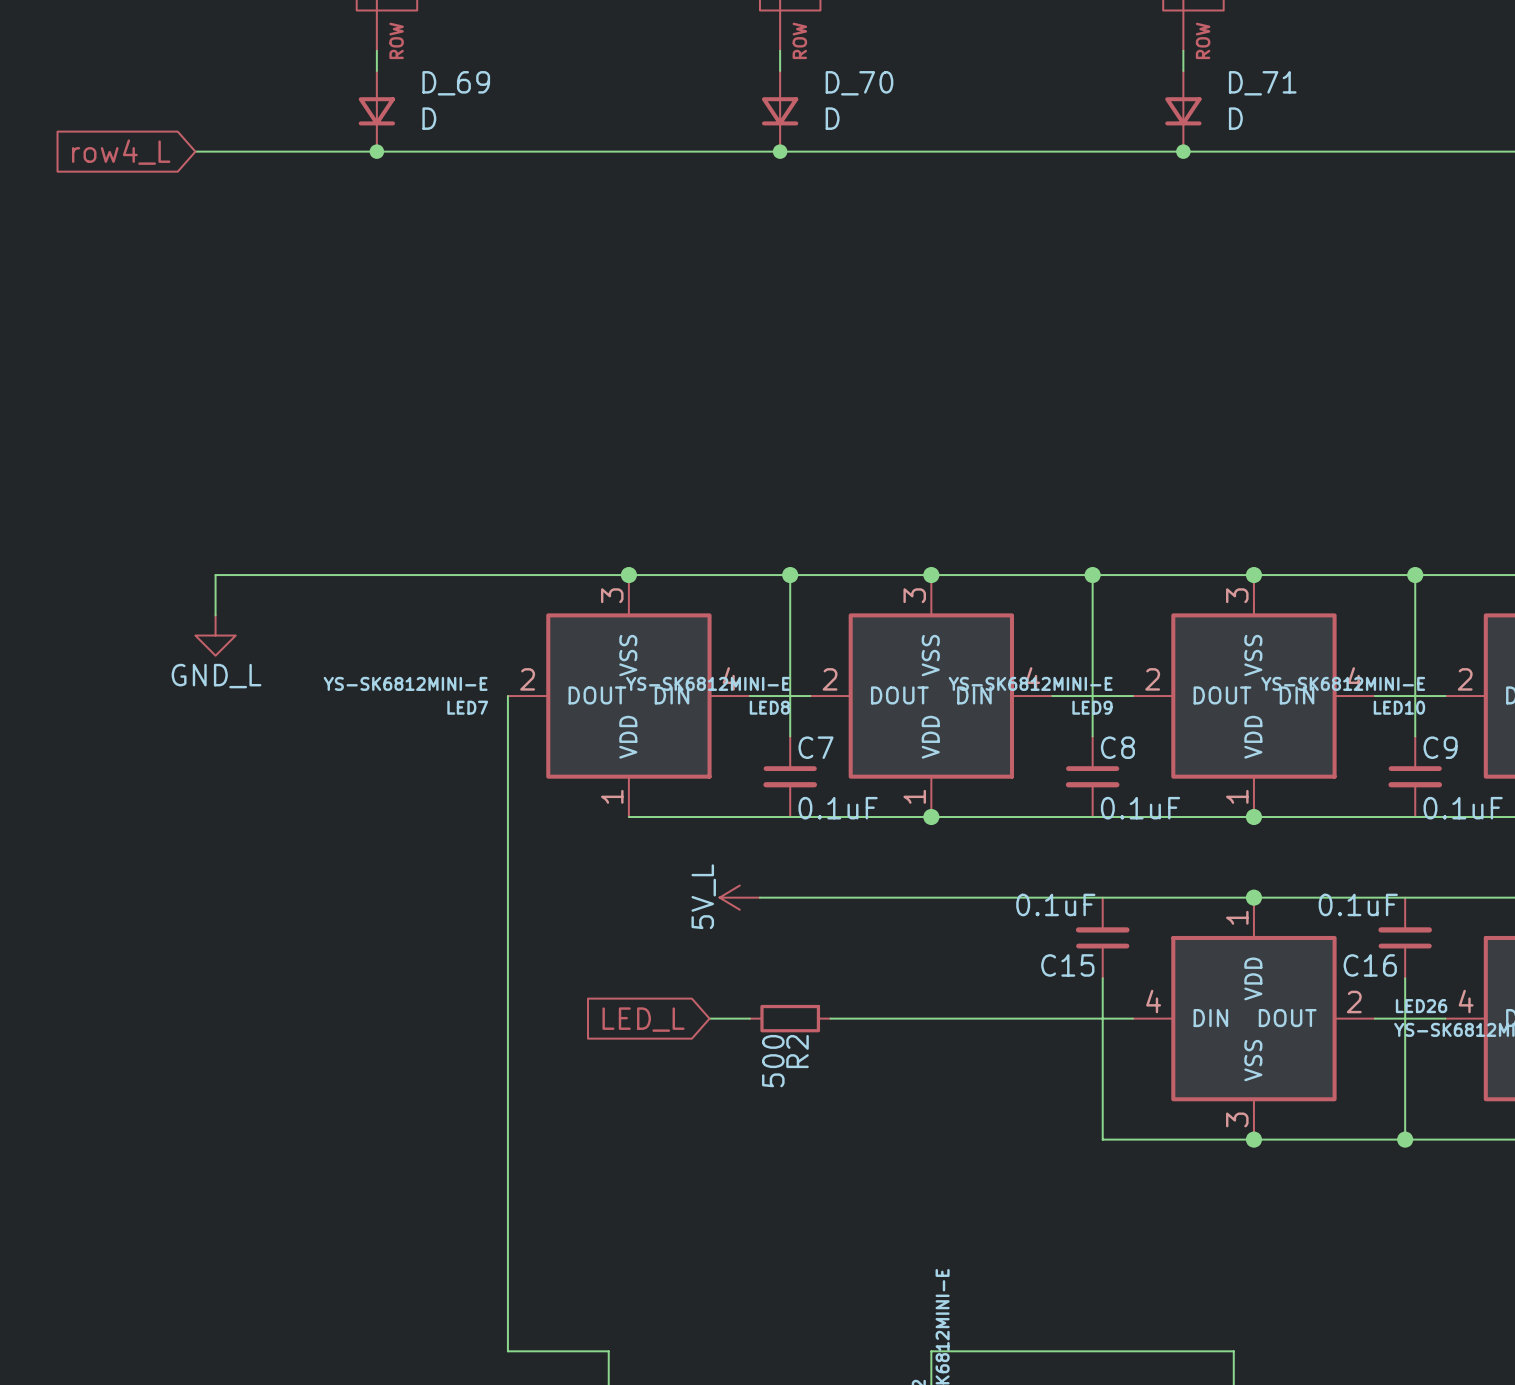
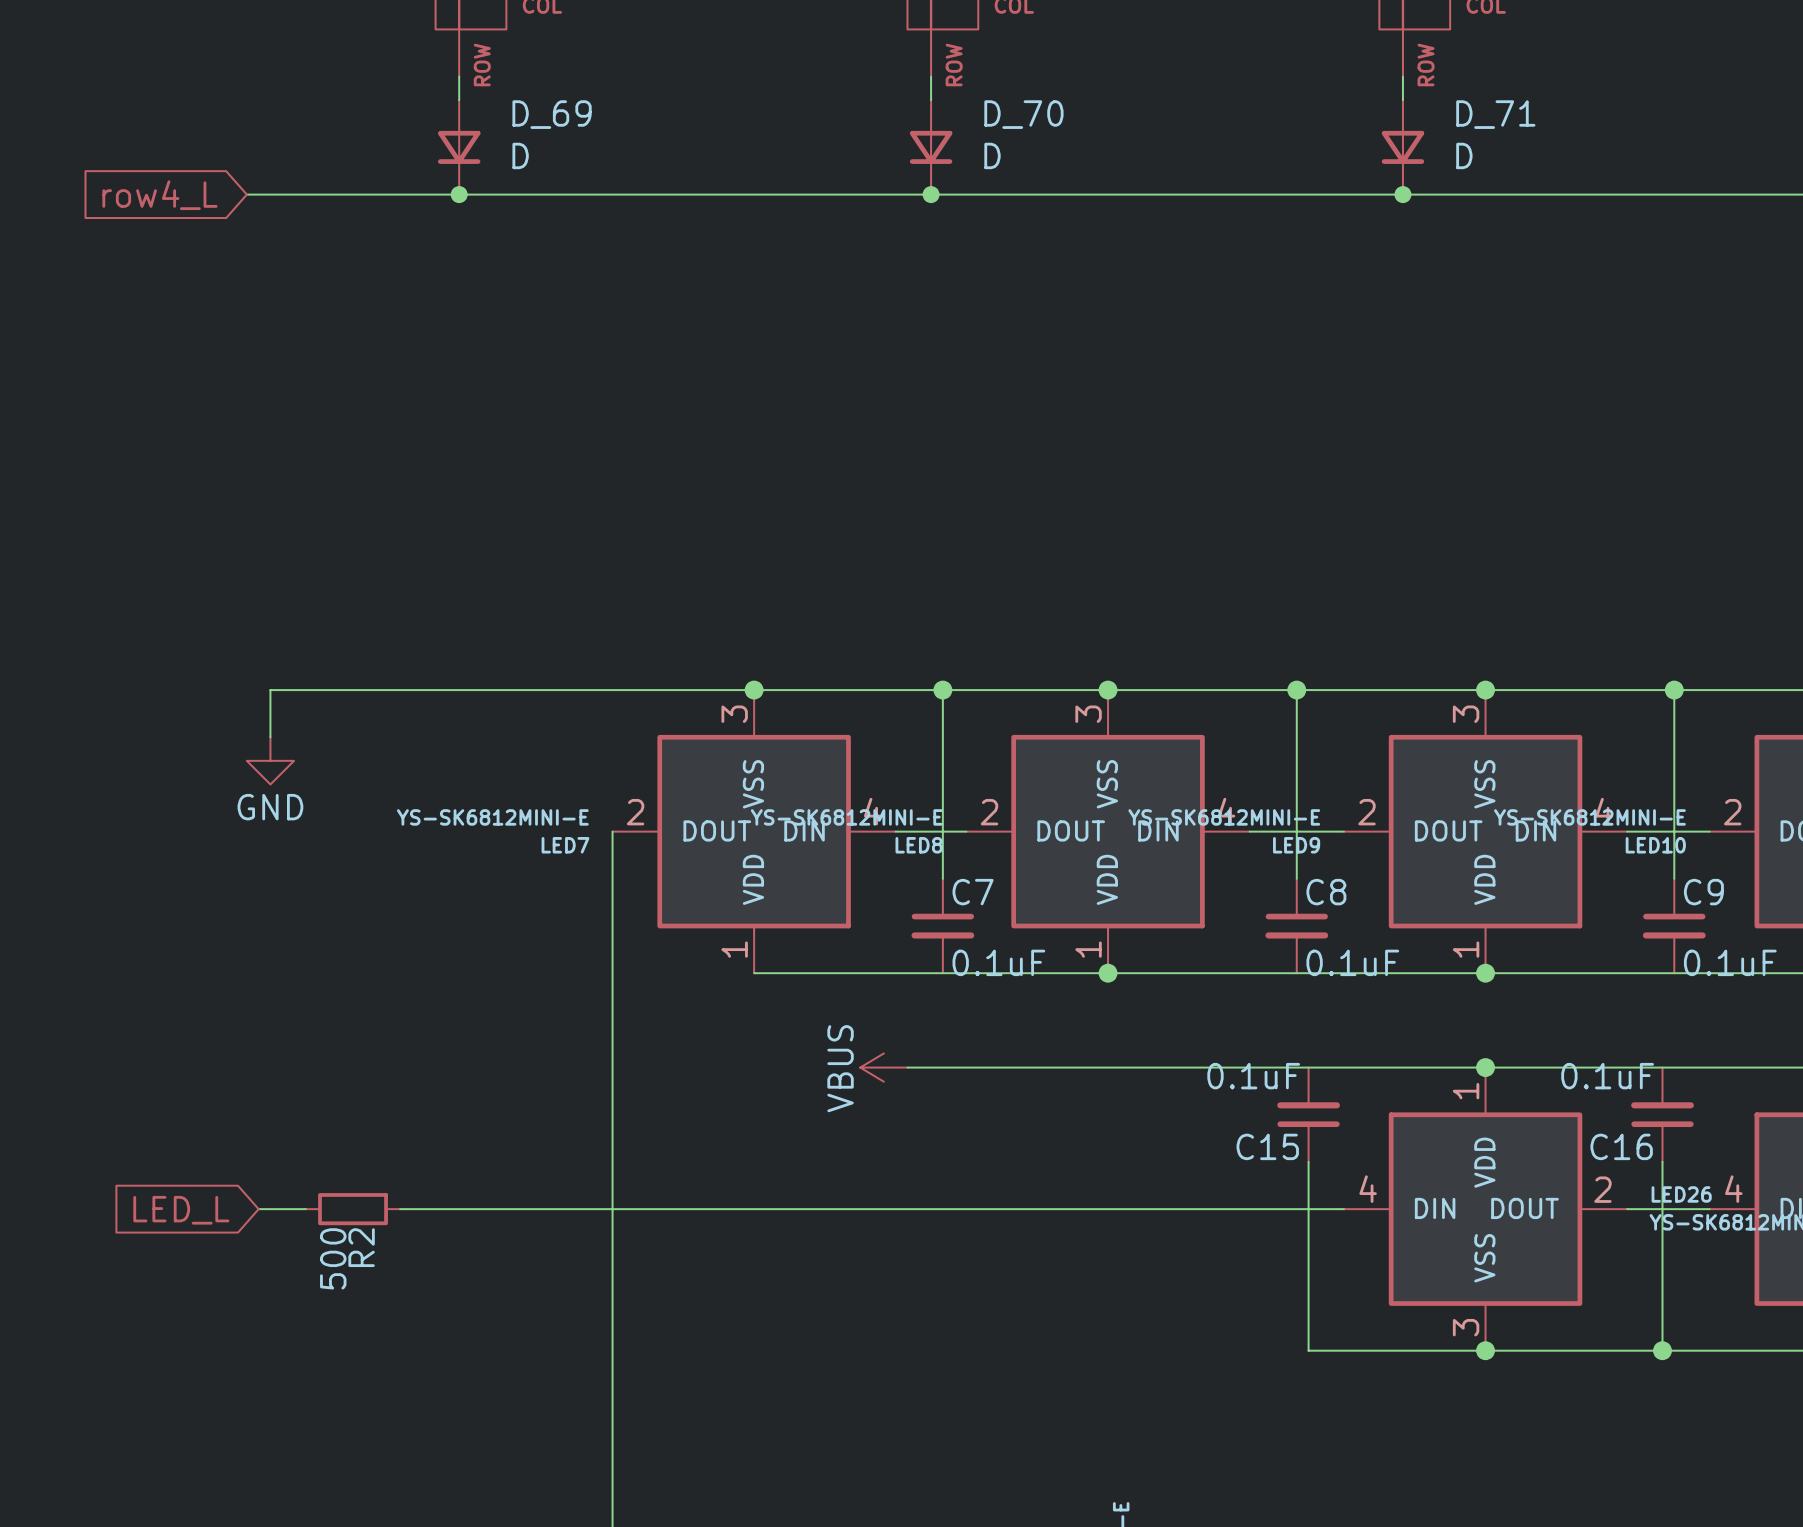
power symbol: GND_L (215, 635) -> GND (270, 760)
power symbol: 5V_L (739, 897) -> VBUS (883, 1067)
wire: none -> (258, 1209) (305, 1209)
wire: none -> (400, 1209) (848, 1209)
wire: none -> (895, 1209) (990, 1209)
R2 position: (790, 1018) -> (353, 1209)
global label: none -> LED_L (181, 1210)
global label: LED_L (643, 1019) -> none

